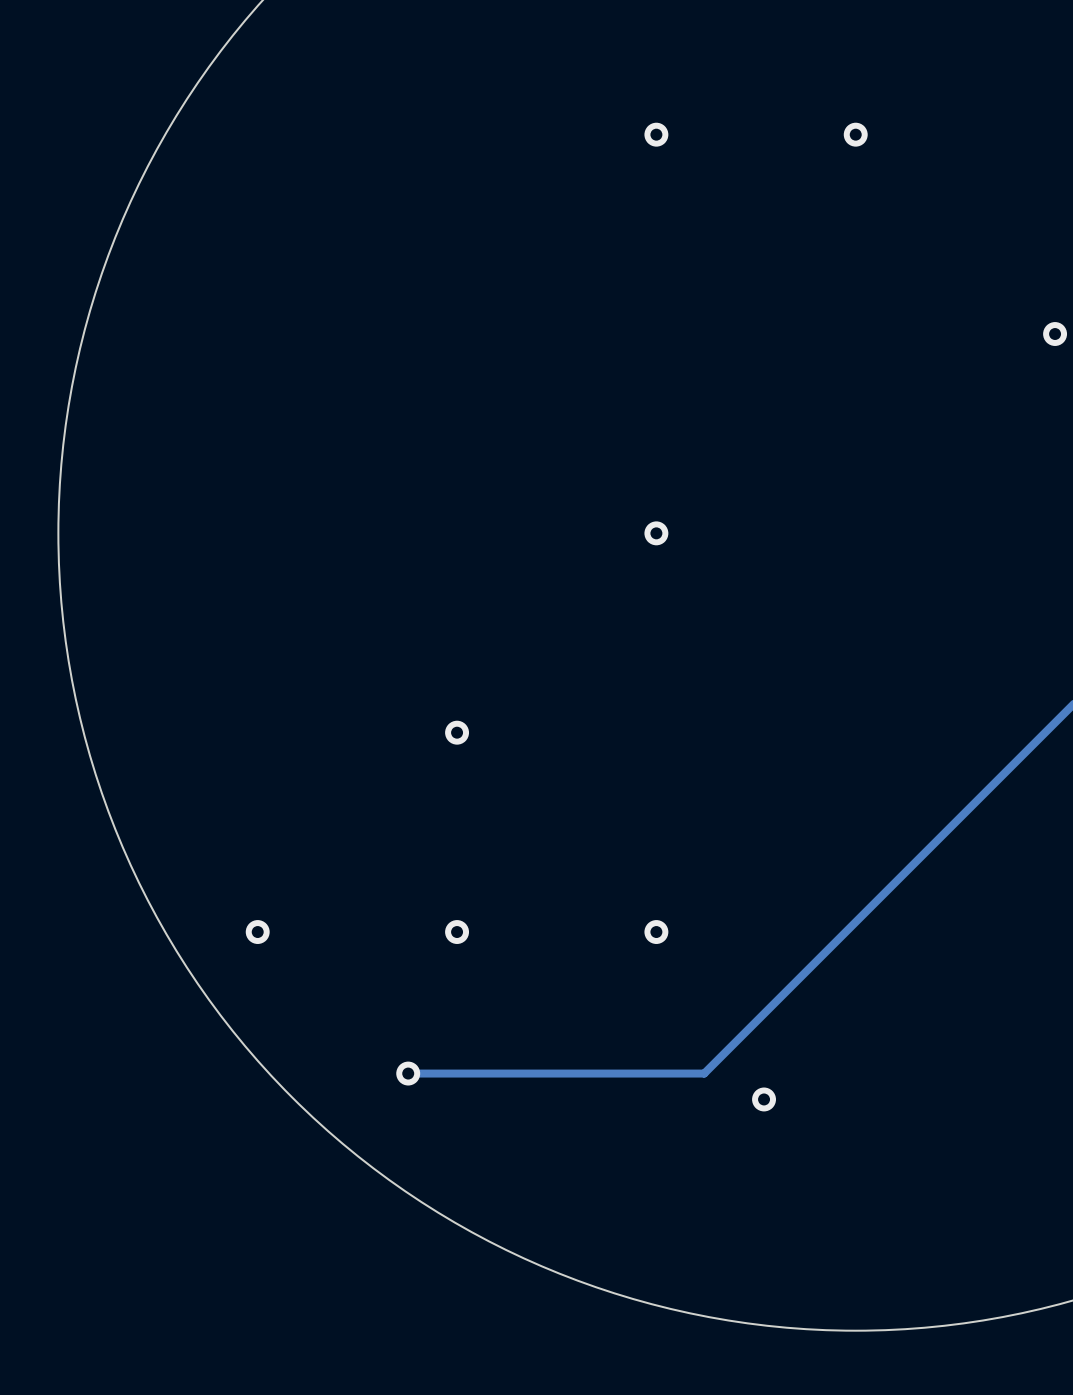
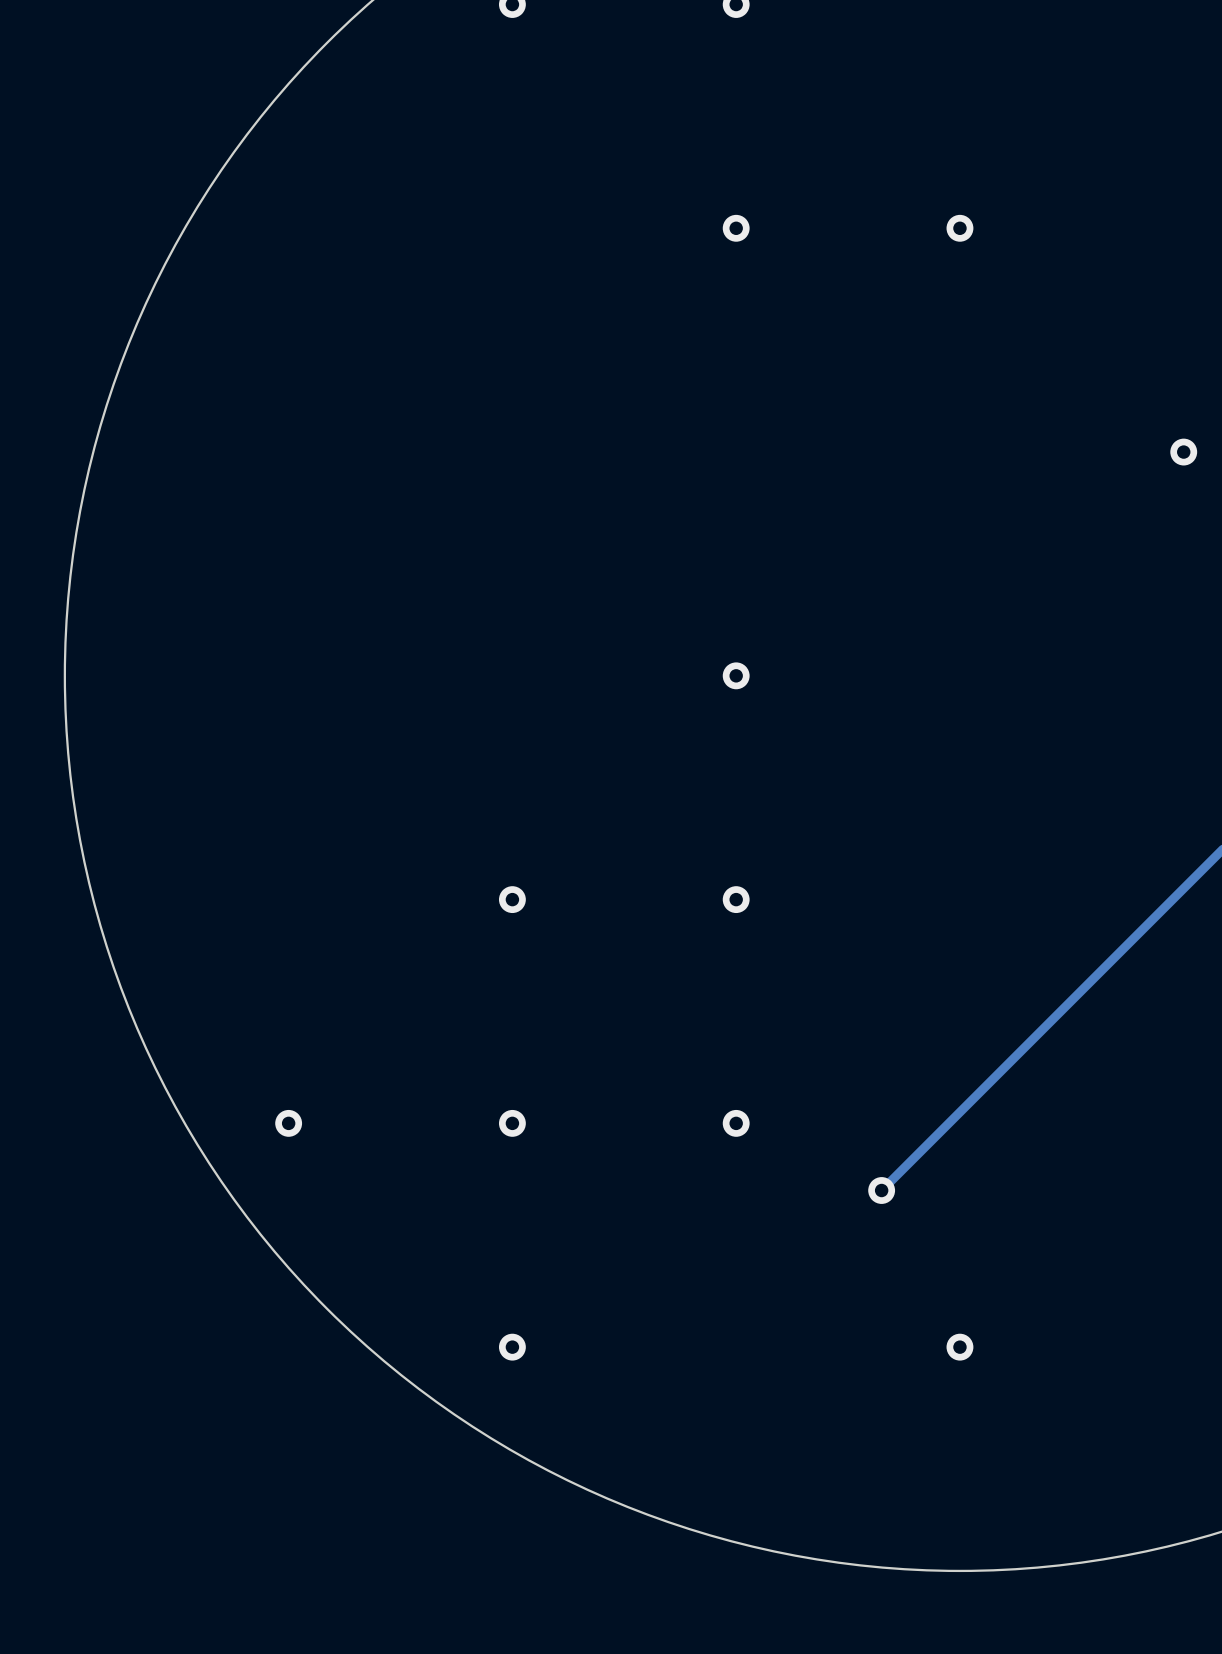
via: none -> (736, 899)
track: (785, 991) (704, 1073) (408, 1073) -> none
via: none -> (881, 1190)
via position: (408, 1073) -> (512, 1347)
via: (764, 1099) -> none
via: none -> (959, 1347)

